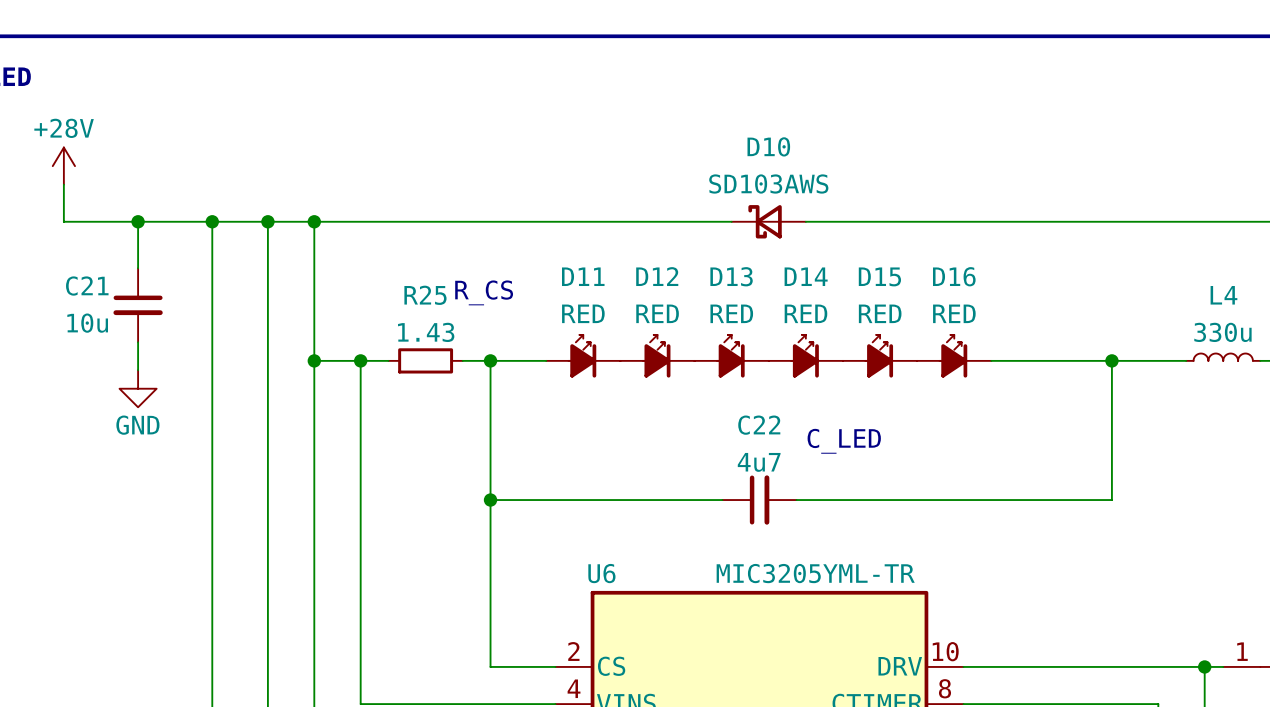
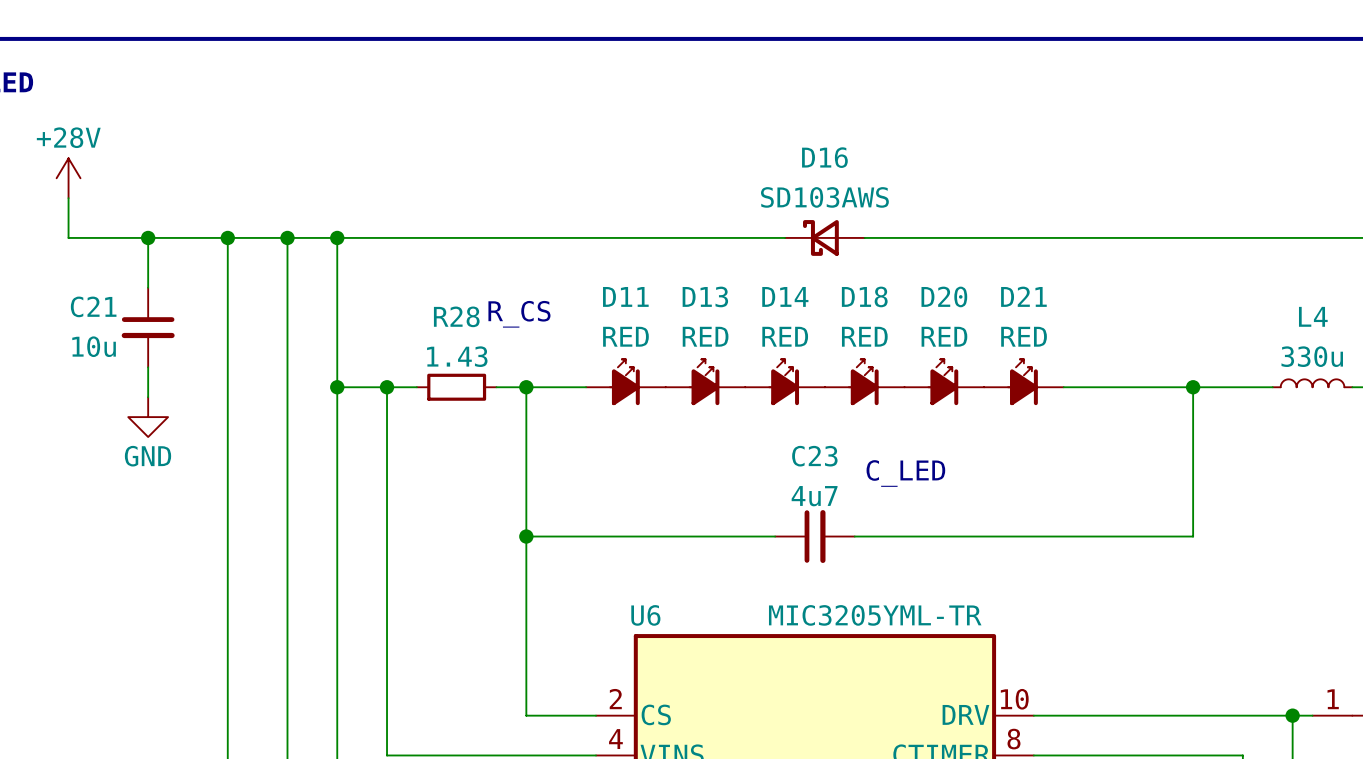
D10 name: D10 (768, 146) -> D16 (824, 157)
D12 name: D12 (657, 276) -> D13 (705, 296)
D13 name: D13 (731, 276) -> D14 (785, 296)
D14 name: D14 (806, 276) -> D18 (864, 296)
D15 name: D15 (879, 276) -> D20 (944, 296)
D16 name: D16 (954, 276) -> D21 (1023, 296)
R25 name: R25 (425, 295) -> R28 (456, 316)
C22 name: C22 (759, 425) -> C23 (814, 456)

